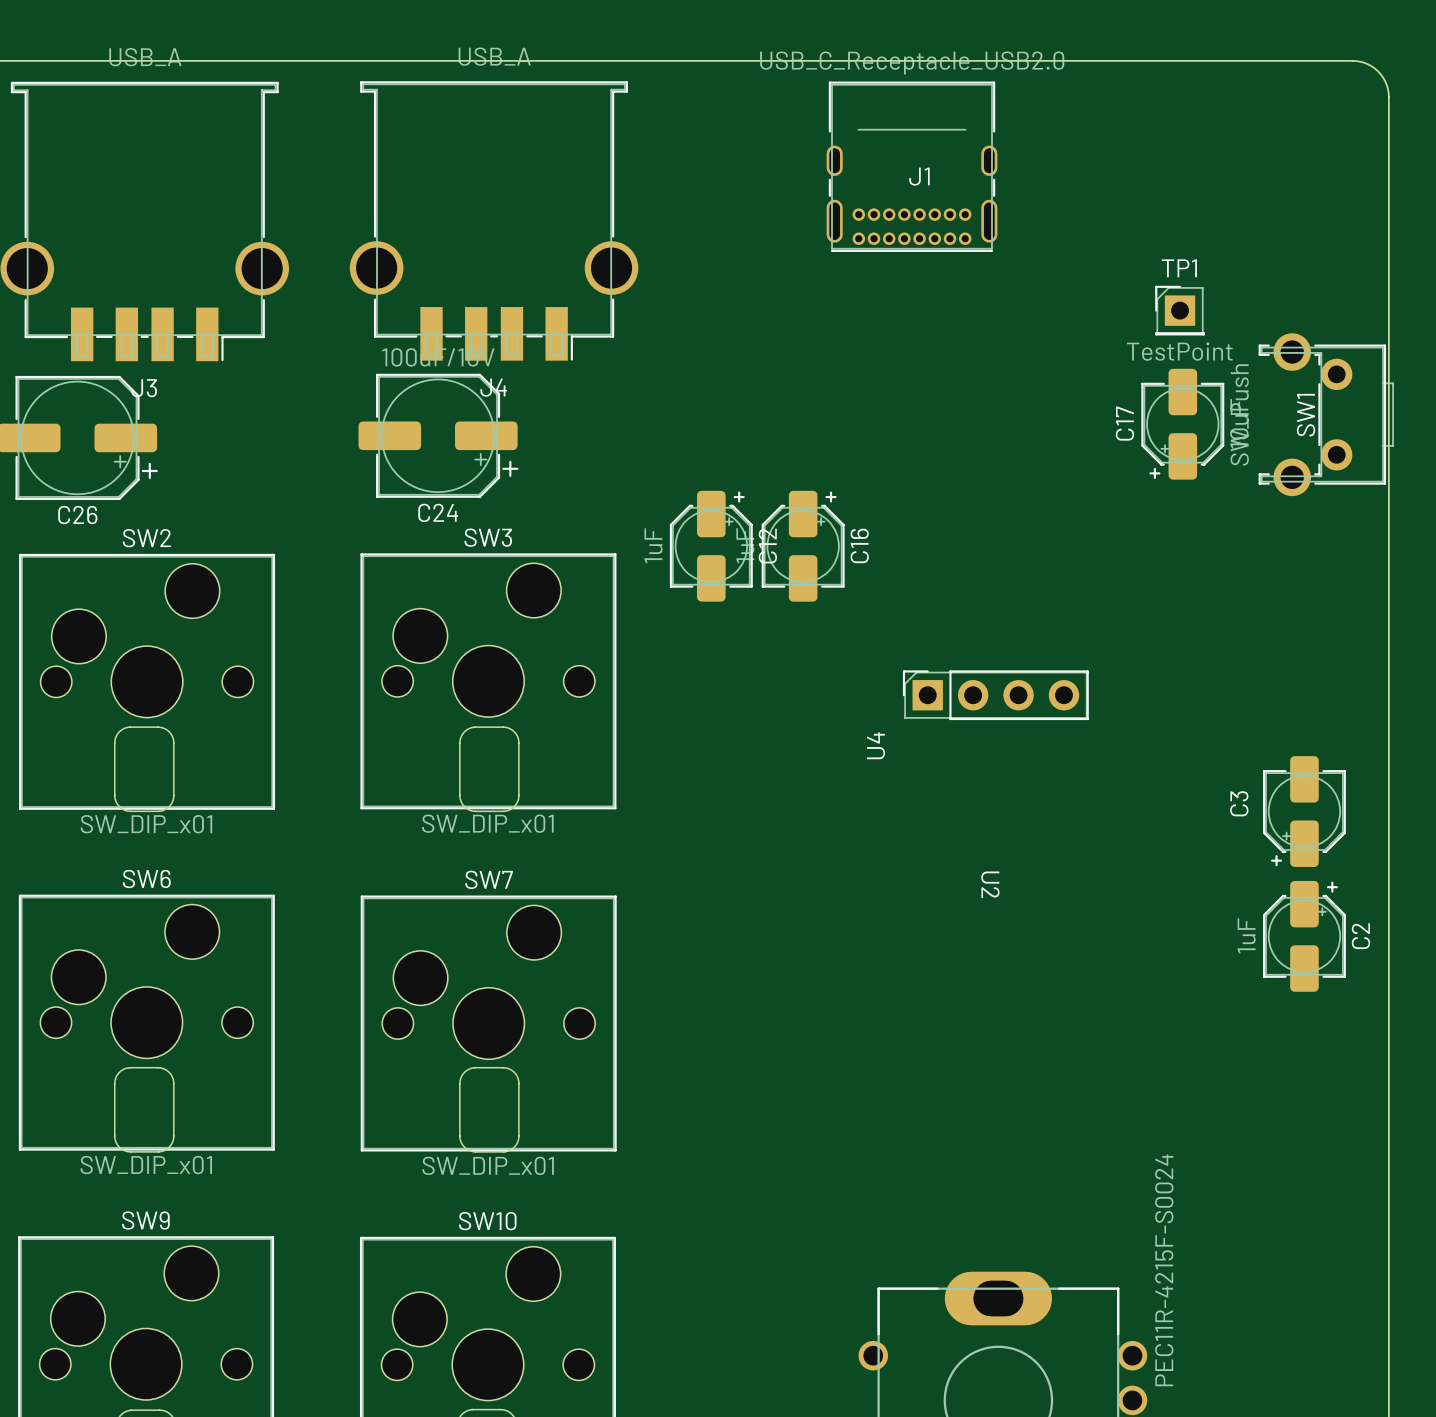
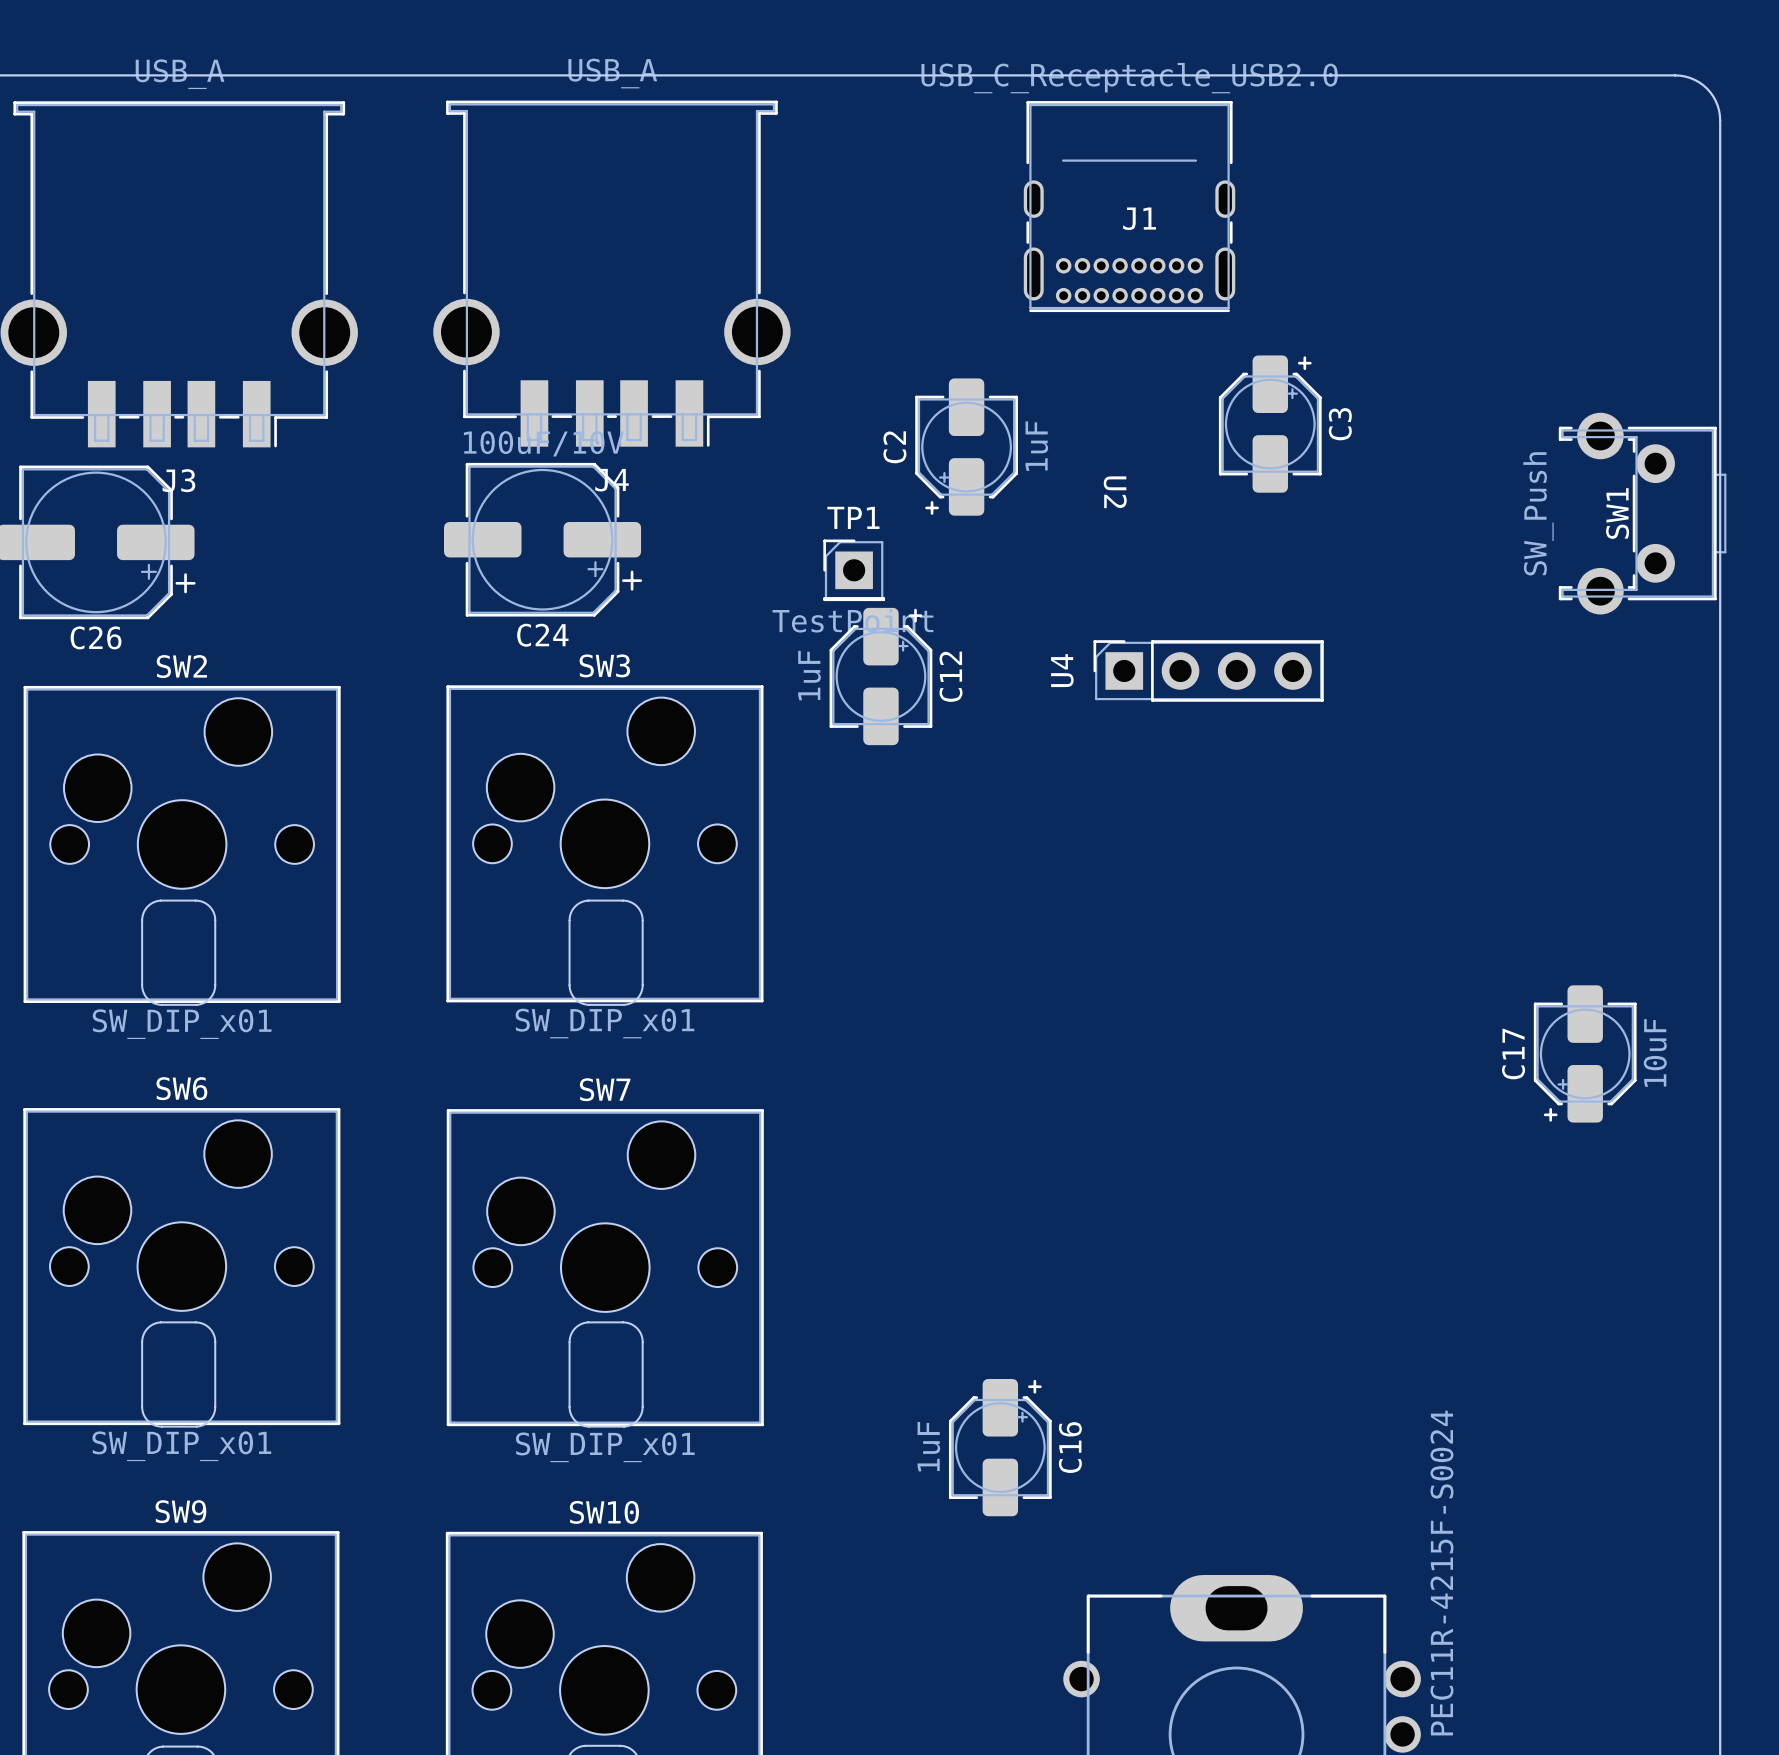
TP1 position: (1180, 310) -> (854, 570)
C17 position: (1182, 424) -> (1585, 1053)
C16 position: (803, 546) -> (1000, 1447)
U4 position: (995, 695) -> (1208, 670)
U4 name position: U4 (876, 745) -> U4 (1062, 670)
C3 rotation: 0° (1304, 811) -> 180° (1270, 424)
C3 position: (1304, 811) -> (1270, 424)
U2 position: (990, 884) -> (1115, 492)
C2 rotation: 0° (1304, 936) -> 180° (966, 447)
C2 position: (1304, 936) -> (966, 447)

